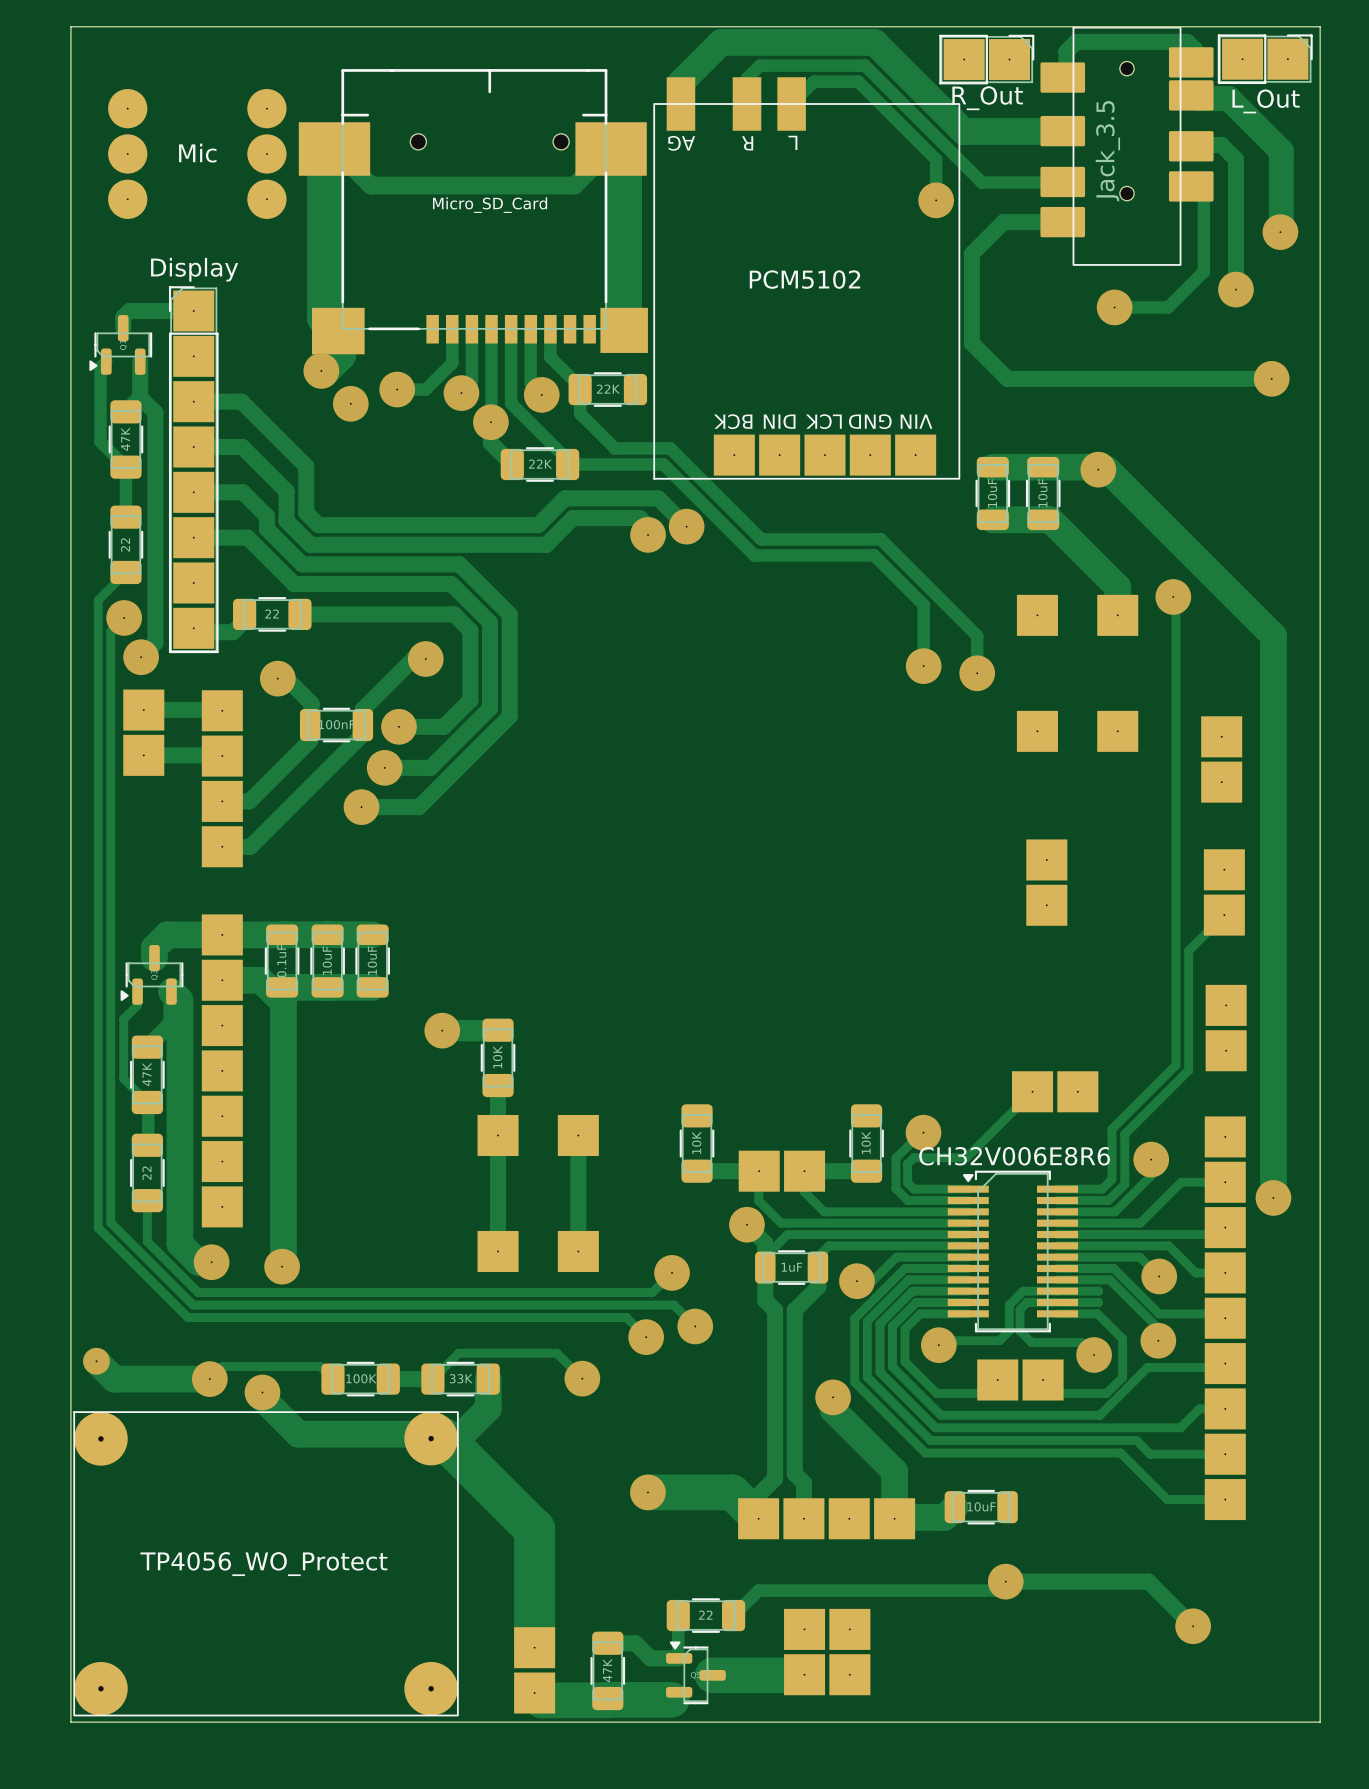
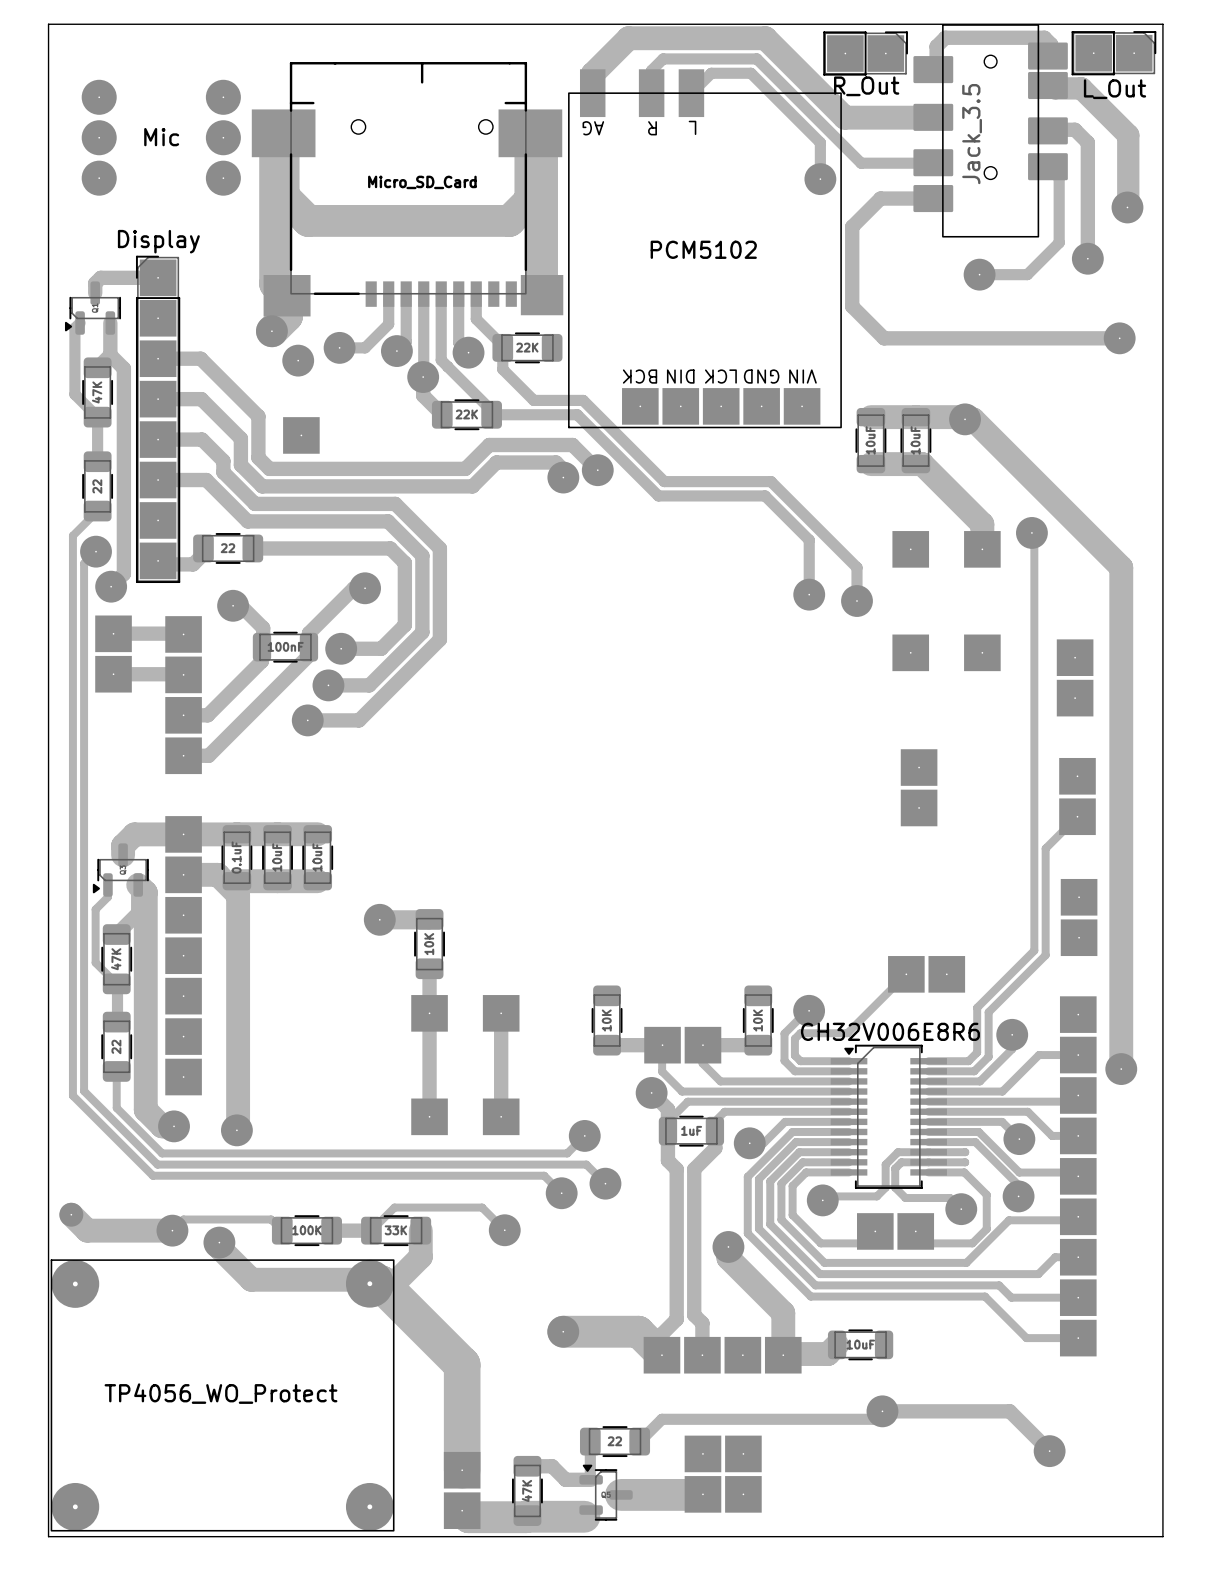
track: (334, 149) (371, 185) (574, 185) (611, 149) -> (283, 133) (283, 196) (308, 220) (509, 220) (530, 200) (530, 133)
part: none -> (301, 435)

